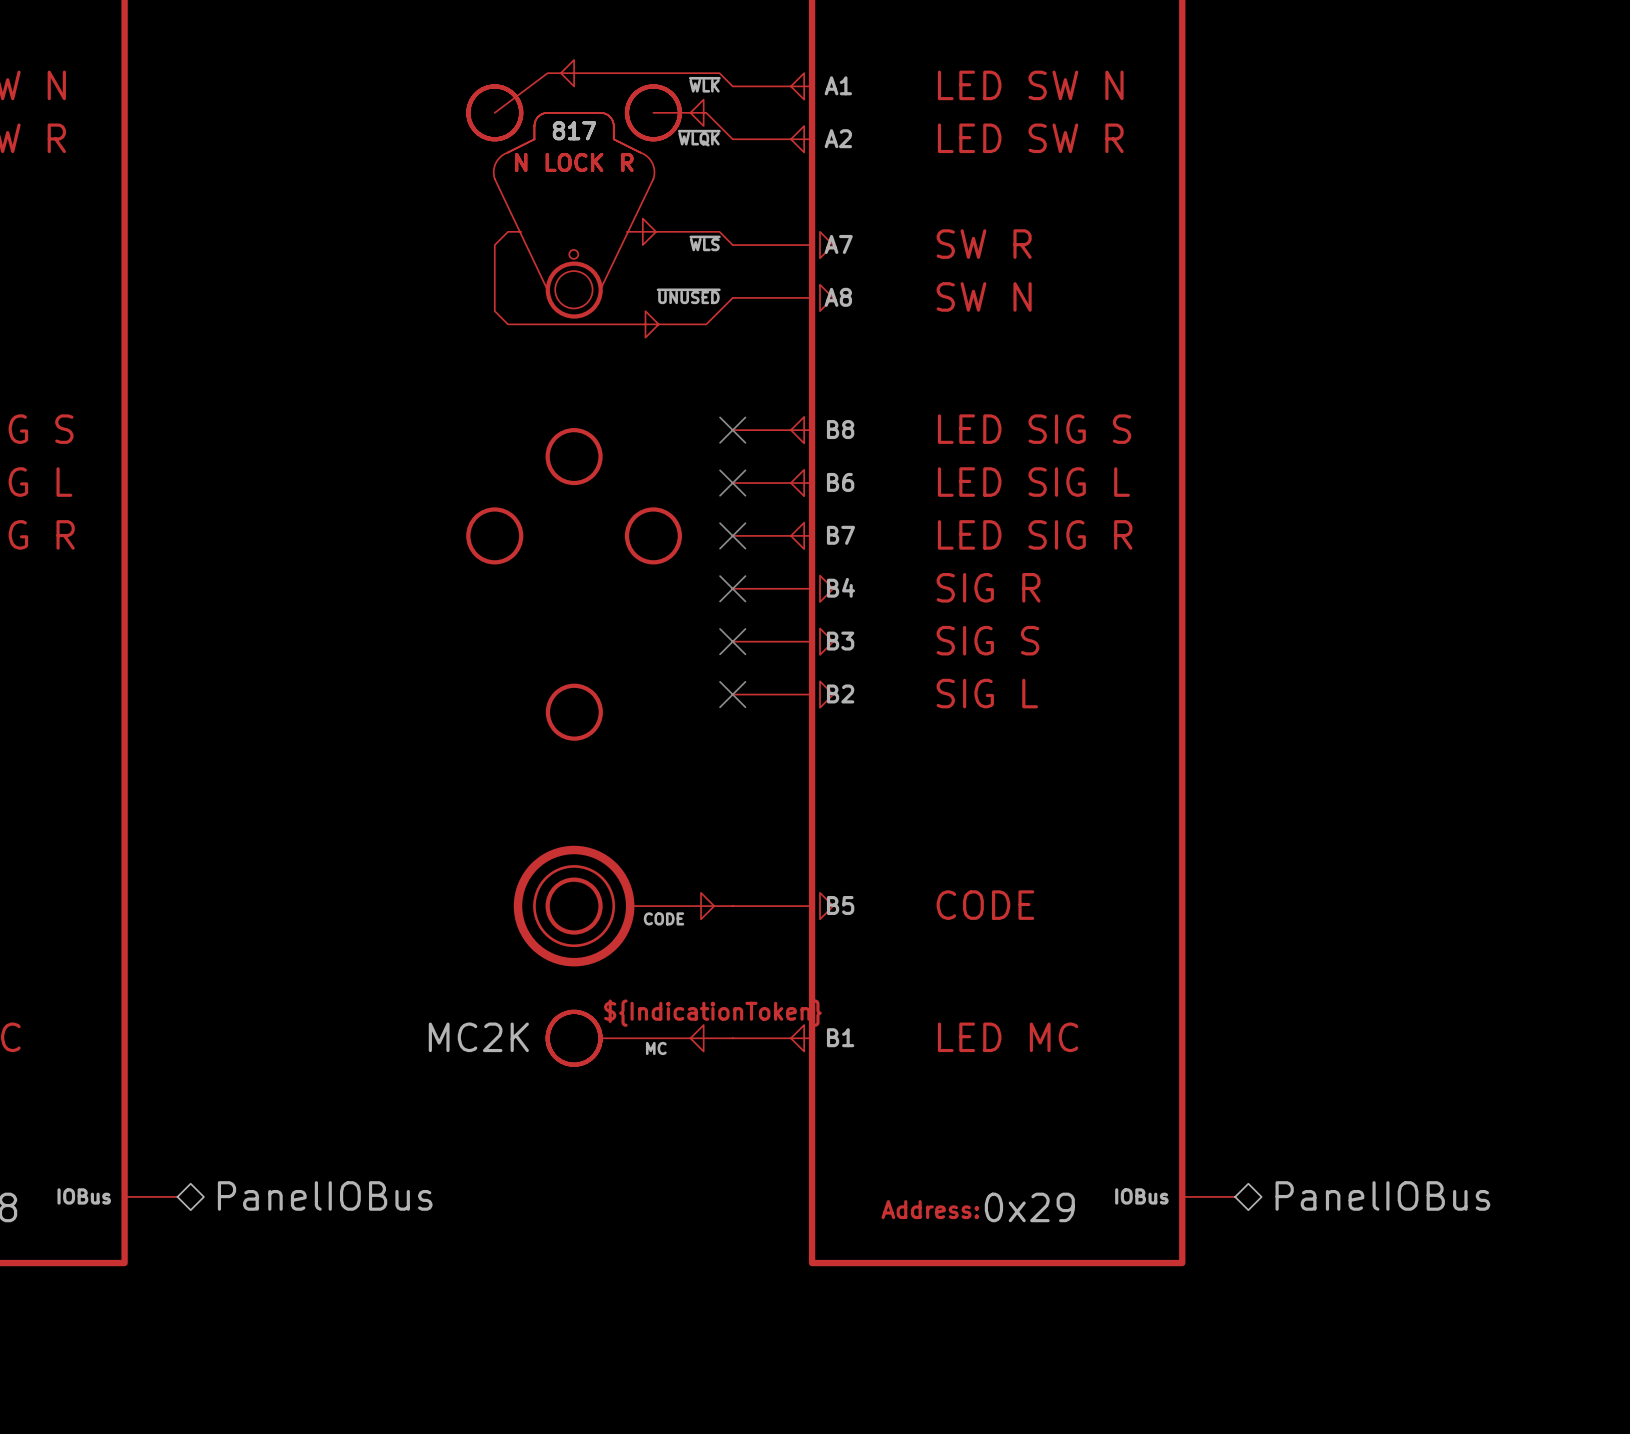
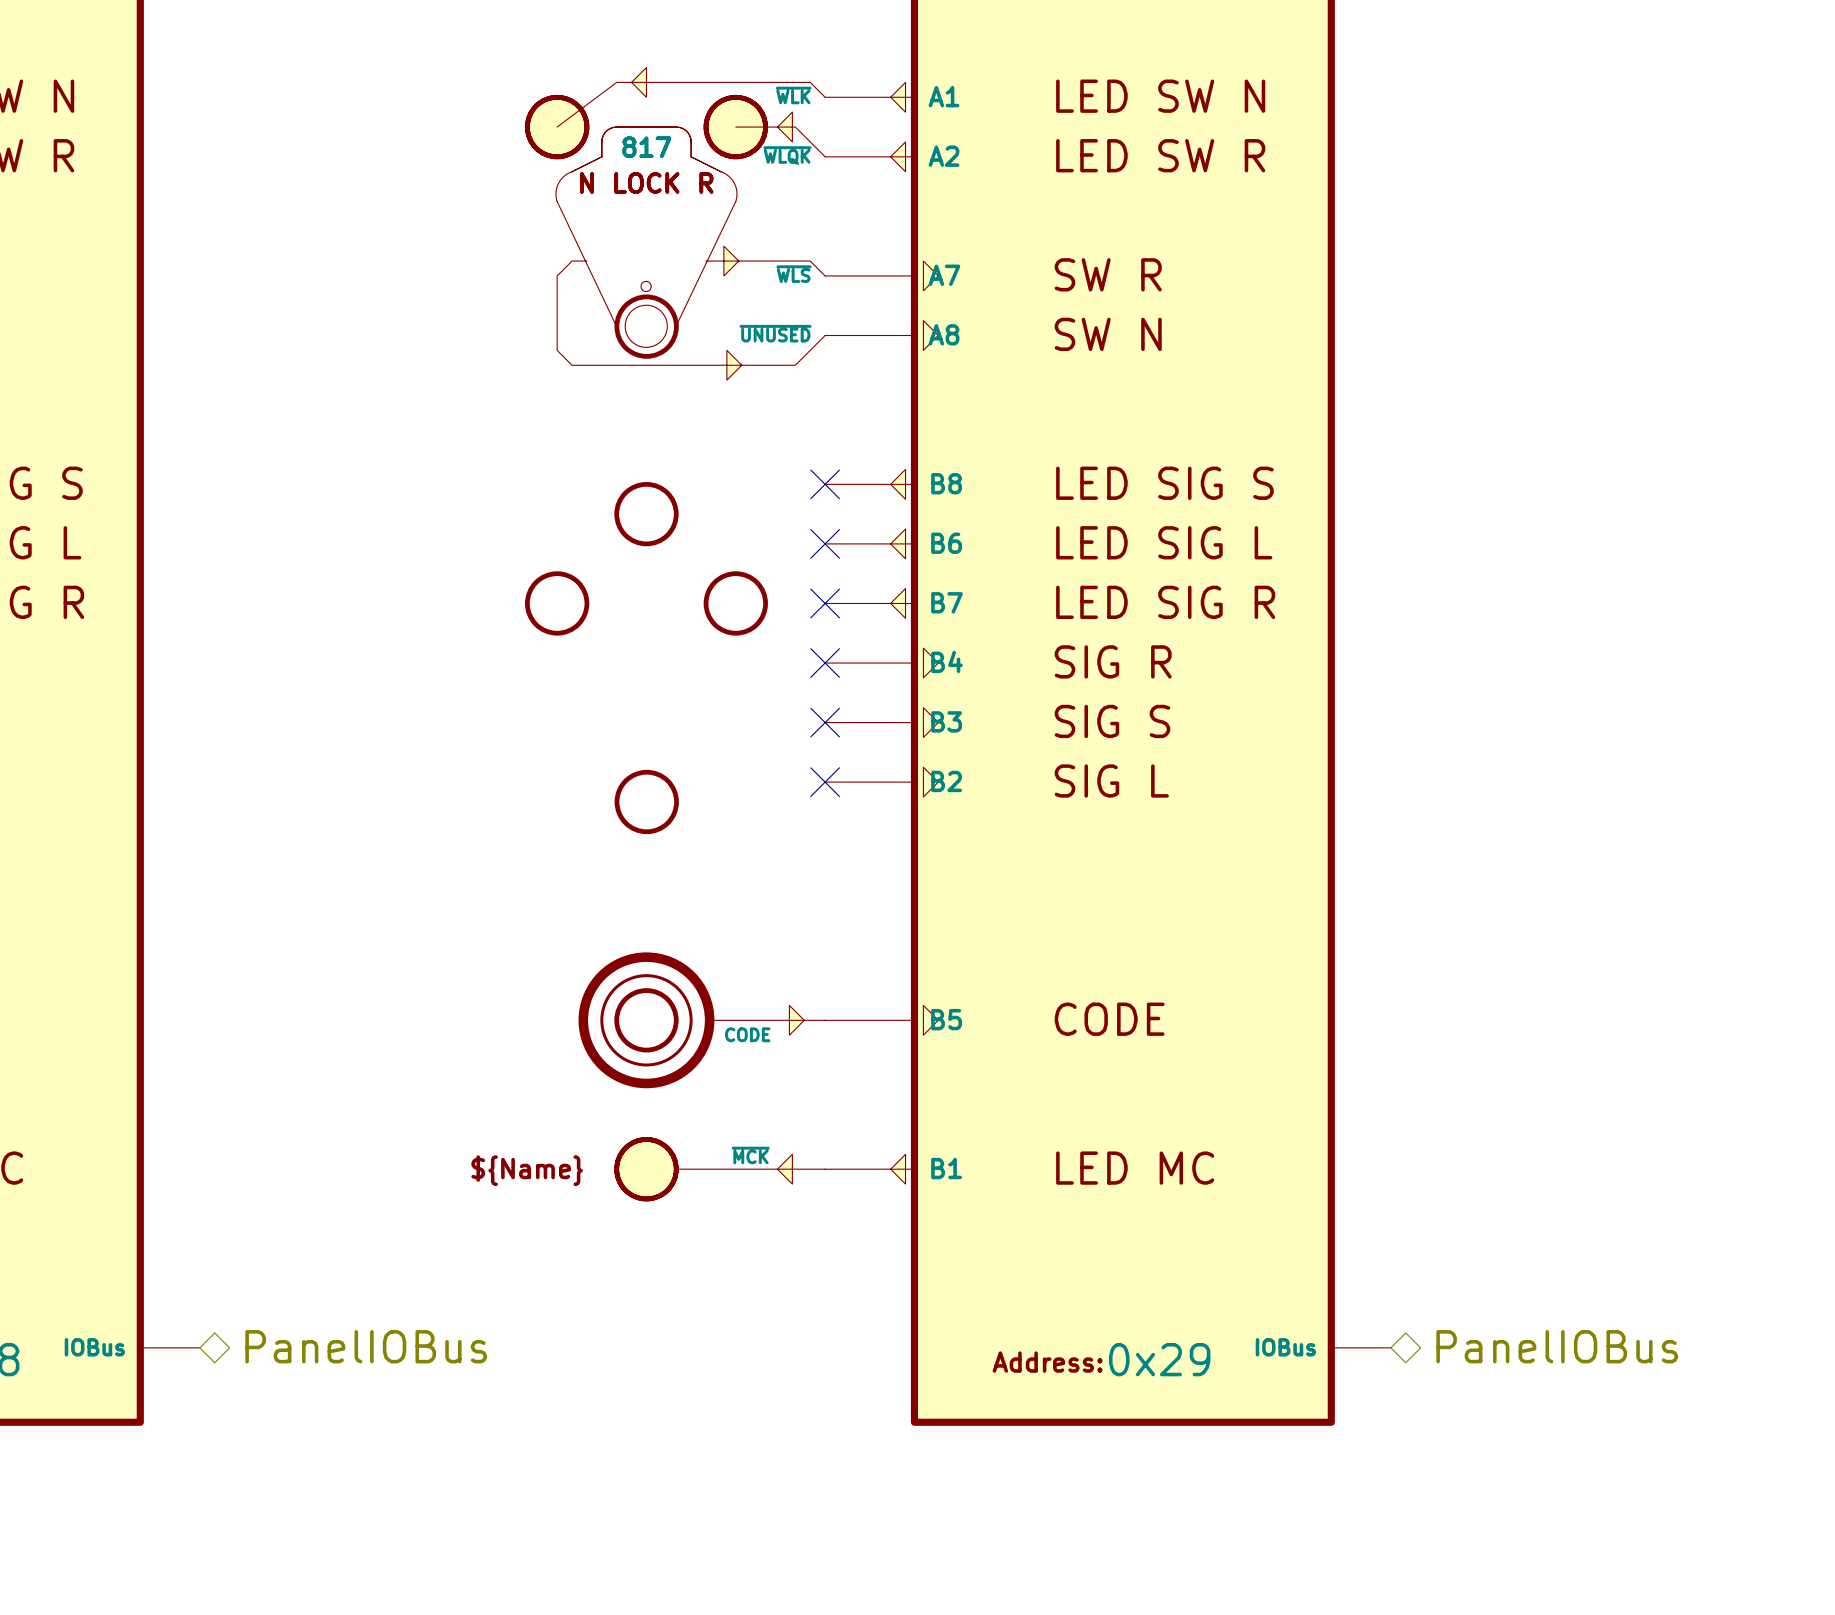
part text: ${IndicationToken} (712, 1013) -> none
part pin name: none -> ~{MCK} (750, 1155)
part text: MC2K (478, 1037) -> none
part text: none -> ${Name} (527, 1170)
part value: MC (656, 1048) -> none

